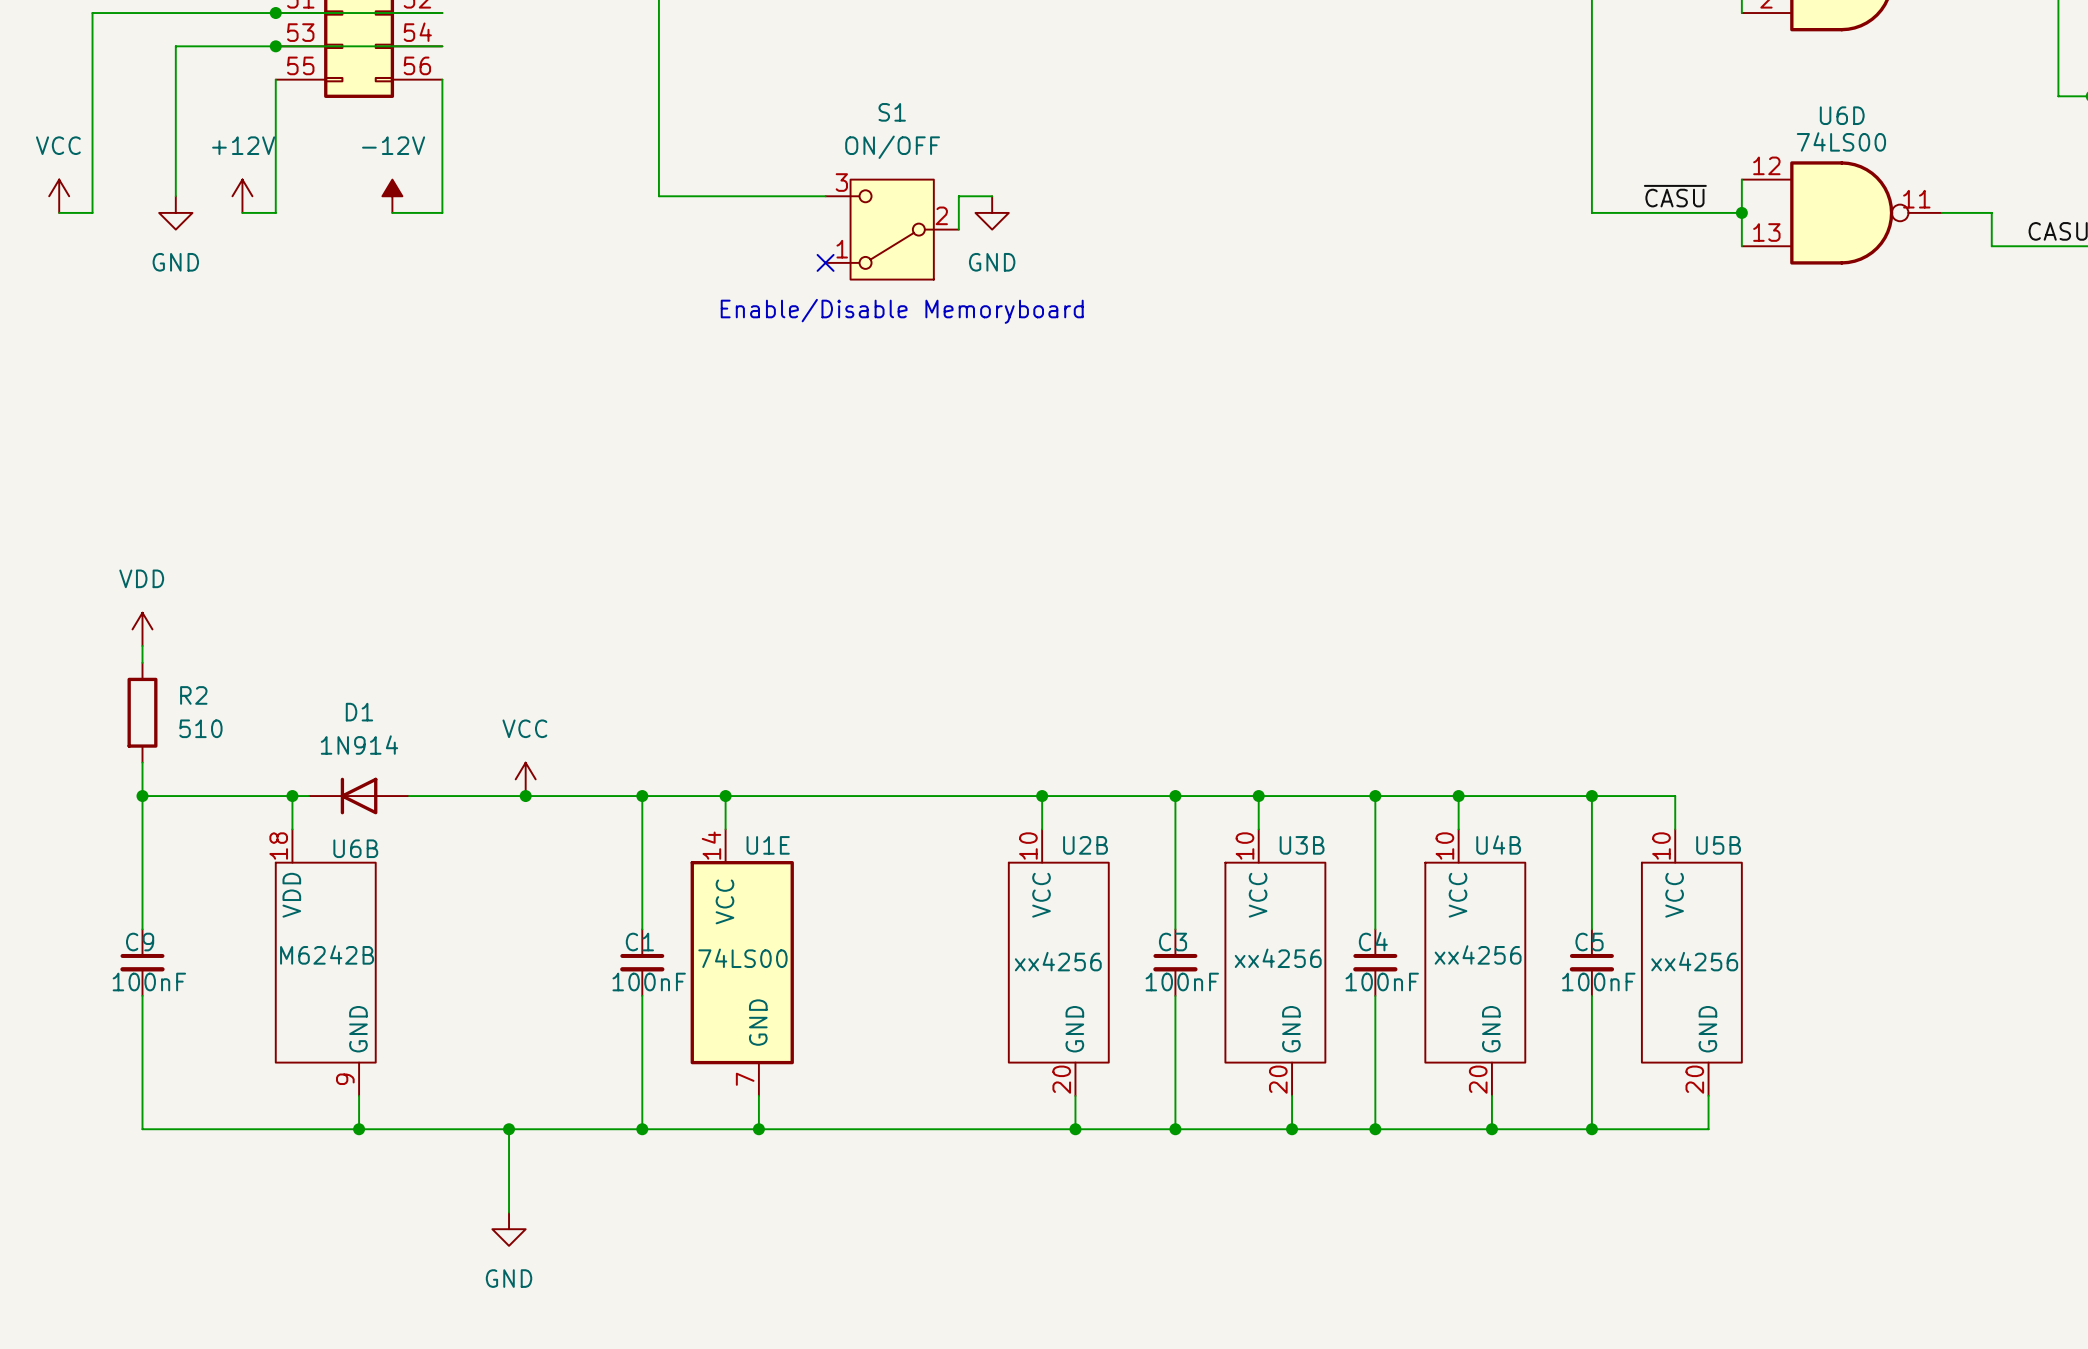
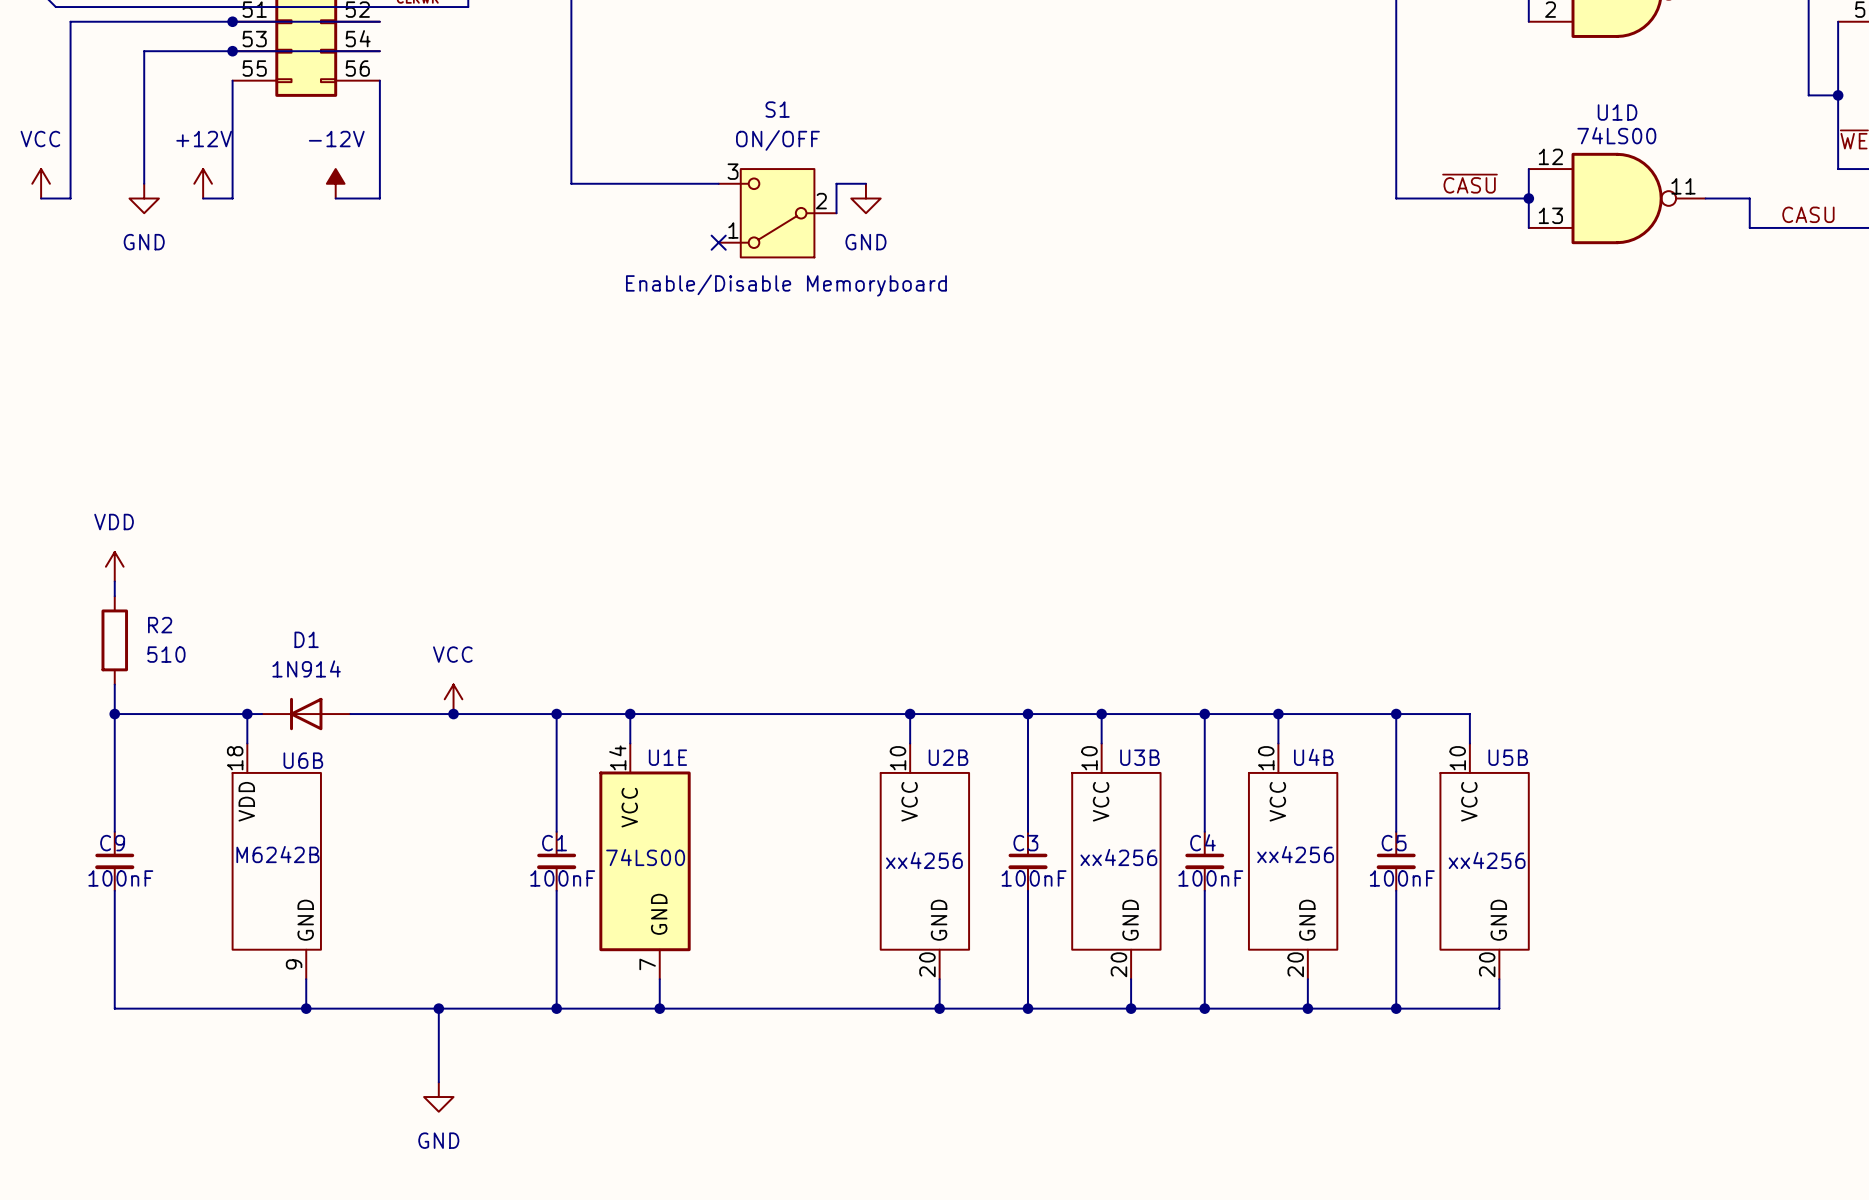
U6D name: U6D (1842, 115) -> U1D (1617, 112)

